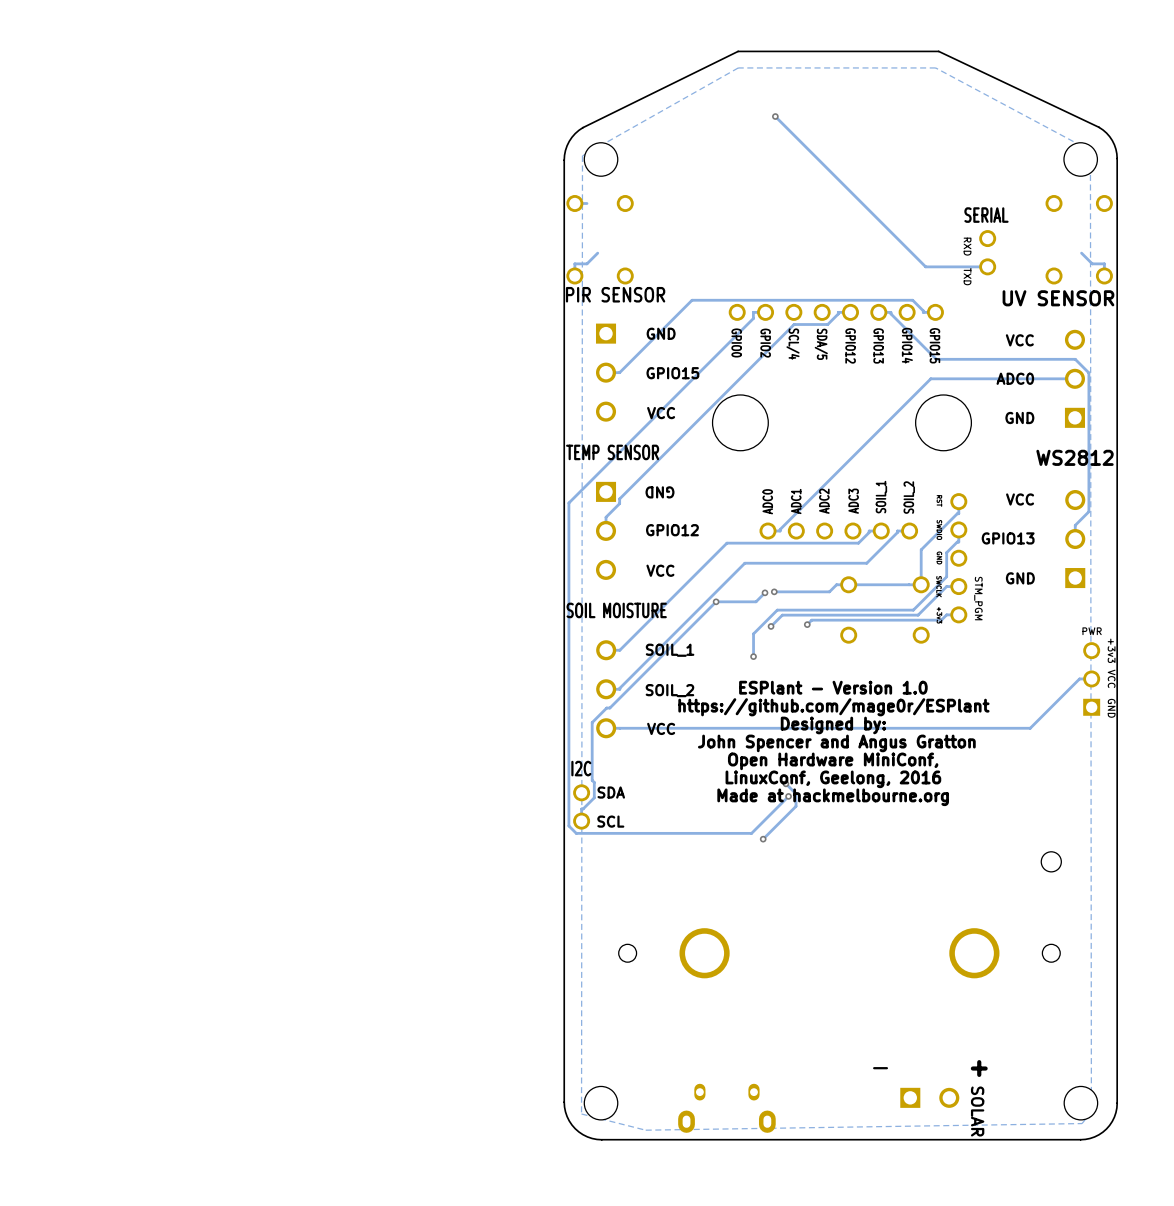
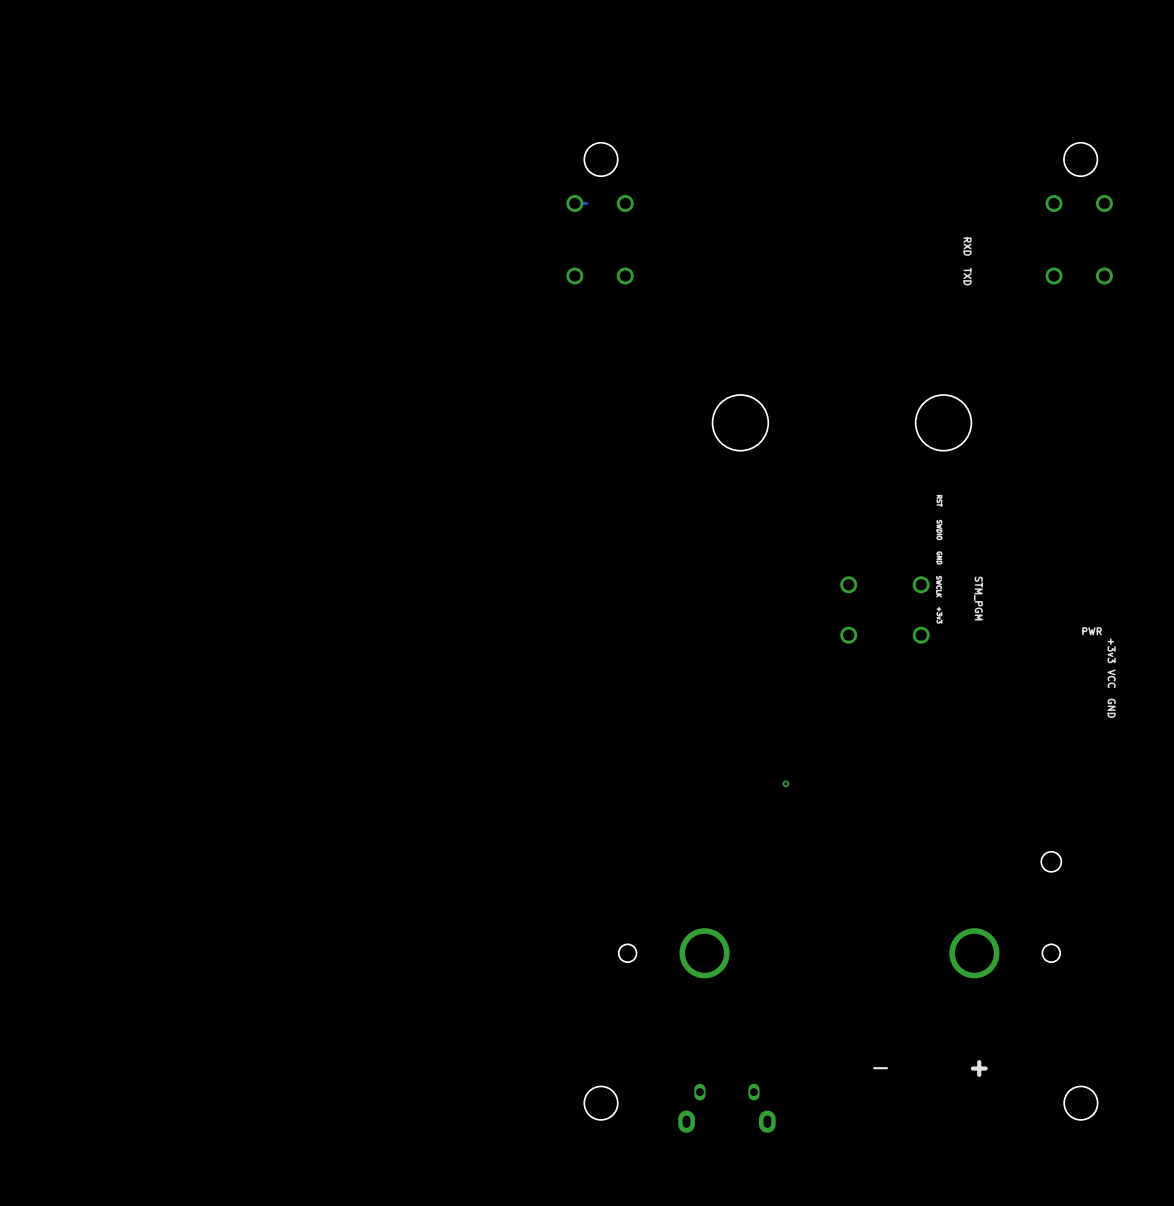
board edge: (938, 51) (1099, 127) (1112, 140) (1116, 153) (1115, 1112) (1112, 1121) (1102, 1132) (1094, 1136) (1080, 1139) (592, 1138) (578, 1131) (572, 1125) (567, 1116) (564, 1102) (565, 150) (572, 137) (583, 127) (738, 51) (938, 51) -> none
zone outline: (935, 67) (1090, 150) (1091, 1112) (1082, 1123) (645, 1130) (581, 1113) (582, 155) (738, 67) (935, 67) -> none
track: (775, 116) (925, 266) (987, 266) -> none
via: (775, 116) -> none
text: SERIAL (986, 215) -> none
part: (987, 252) -> none
track: (597, 253) (586, 263) (574, 263) (574, 275) -> none
track: (1081, 253) (1092, 263) (1104, 263) (1104, 275) -> none
text: PIR SENSOR (615, 294) -> none
text: UV SENSOR (1058, 298) -> none
track: (765, 312) (753, 312) (753, 318) (568, 503) (568, 825) (576, 833) (751, 833) (788, 796) -> none
part: (836, 312) -> none
track: (850, 312) (838, 312) (827, 324) (794, 324) (619, 498) (619, 503) (606, 517) (606, 530) -> none
track: (878, 312) (890, 312) (936, 359) (1075, 359) (1088, 372) (1088, 511) (1075, 525) (1075, 539) -> none
track: (935, 312) (923, 312) (912, 300) (692, 300) (619, 372) (606, 372) -> none
text: GND (661, 333) -> none
text: VCC (1019, 340) -> none
text: GPIO0 (736, 342) -> none
text: GPIO2 (765, 343) -> none
text: SCL/4 (792, 344) -> none
text: SDA/5 (821, 344) -> none
text: GPIO12 (850, 345) -> none
text: GPIO13 (878, 345) -> none
text: GPIO14 (907, 345) -> none
text: GPIO15 (934, 345) -> none
part: (606, 372) -> none
text: GPIO15 (672, 373) -> none
text: ADC0 (1015, 378) -> none
track: (1074, 378) (930, 378) (780, 531) (768, 531) -> none
part: (1074, 378) -> none
text: VCC (661, 413) -> none
text: GND (1019, 418) -> none
text: TEMP SENSOR (612, 452) -> none
text: WS2812 (1075, 457) -> none
text: GND (659, 492) -> none
text: SOIL_1 (881, 497) -> none
text: SOIL_2 (909, 497) -> none
text: VCC (1020, 499) -> none
text: ADC0 (767, 501) -> none
text: ADC1 (796, 501) -> none
text: ADC2 (824, 501) -> none
text: ADC3 (853, 501) -> none
track: (958, 501) (958, 513) (921, 549) (921, 584) (836, 584) (829, 591) (774, 591) -> none
track: (958, 529) (958, 542) (946, 552) (946, 576) (913, 610) (777, 610) (753, 633) (753, 656) -> none
part: (606, 530) -> none
text: GPIO12 (672, 530) -> none
part: (838, 531) -> none
track: (881, 531) (869, 531) (858, 543) (726, 543) (619, 650) (606, 650) -> none
track: (909, 531) (897, 531) (866, 563) (744, 563) (619, 689) (606, 689) -> none
text: GPIO13 (1008, 538) -> none
part: (1075, 539) -> none
part: (958, 558) -> none
text: VCC (660, 570) -> none
text: GND (1020, 578) -> none
track: (958, 586) (946, 586) (918, 615) (782, 615) (771, 626) -> none
via: (774, 591) -> none
track: (765, 592) (756, 601) (716, 601) (609, 708) (606, 708) (592, 722) (592, 780) (594, 782) (594, 797) (581, 809) (581, 821) -> none
via: (765, 592) -> none
via: (716, 601) -> none
text: SOIL MOISTURE (616, 610) -> none
track: (958, 614) (946, 614) (941, 620) (811, 620) (807, 624) -> none
via: (807, 624) -> none
via: (771, 626) -> none
text: SOIL_1 (670, 650) -> none
via: (753, 656) -> none
track: (1091, 678) (1079, 678) (1030, 728) (606, 728) -> none
part: (1091, 678) -> none
text: ESPlant - Version 1.0 (833, 687) -> none
part: (606, 689) -> none
text: SOIL_2 (669, 690) -> none
text: https://github.com/mage0r/ESPlant (833, 707) -> none
text: Designed by: (833, 725) -> none
text: VCC (661, 728) -> none
text: John Spencer and Angus Gratton (836, 743) -> none
text: Open Hardware MiniConf, (833, 761) -> none
text: I2C (581, 768) -> none
text: LinuxConf, Geelong, 2016 (833, 779) -> none
track: (785, 783) (796, 793) (796, 806) (763, 839) -> none
text: SDA (611, 792) -> none
via: (788, 796) -> none
text: Made at hackmelbourne.org (833, 797) -> none
part: (581, 806) -> none
text: SCL (610, 821) -> none
via: (763, 839) -> none
part: (929, 1097) -> none
text: SOLAR (977, 1111) -> none

